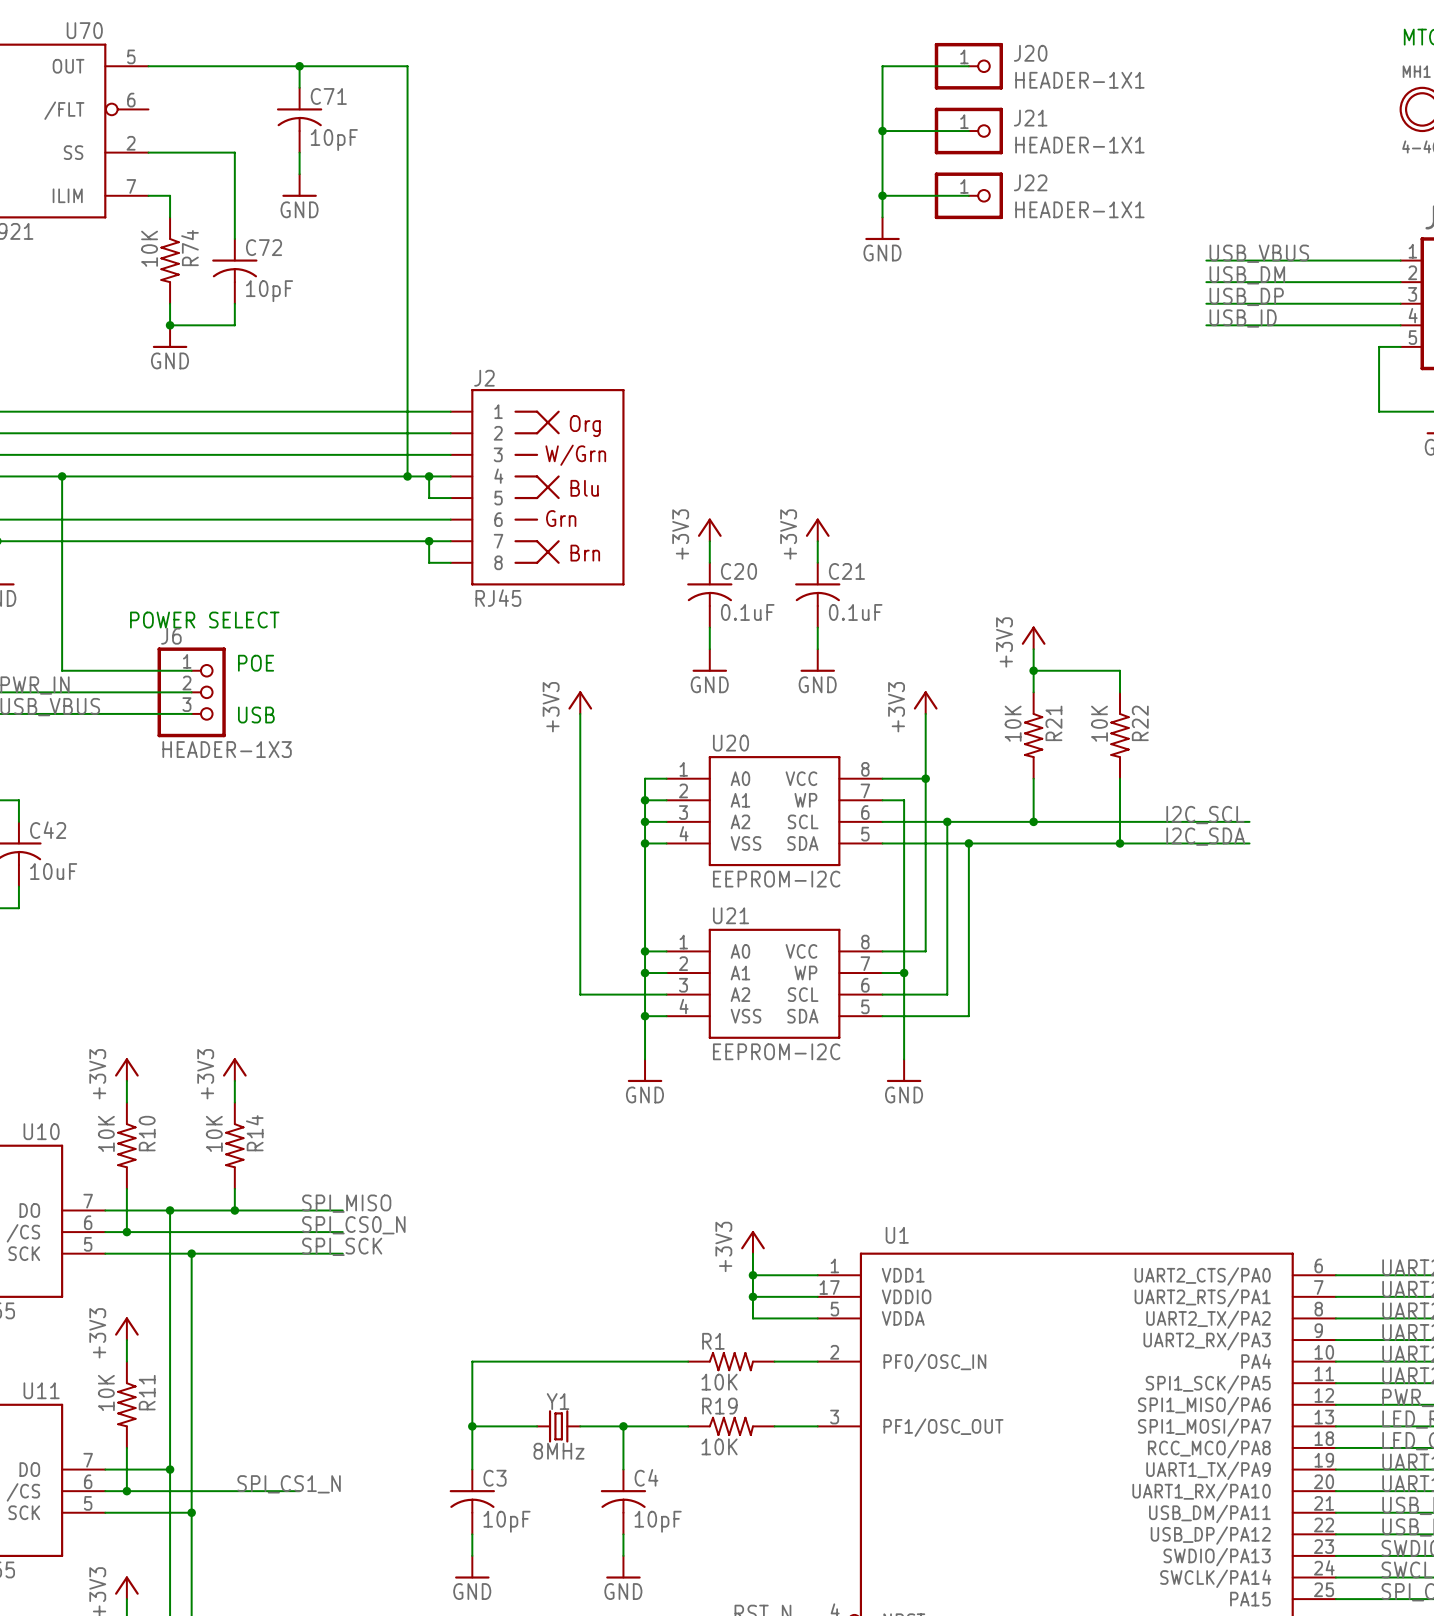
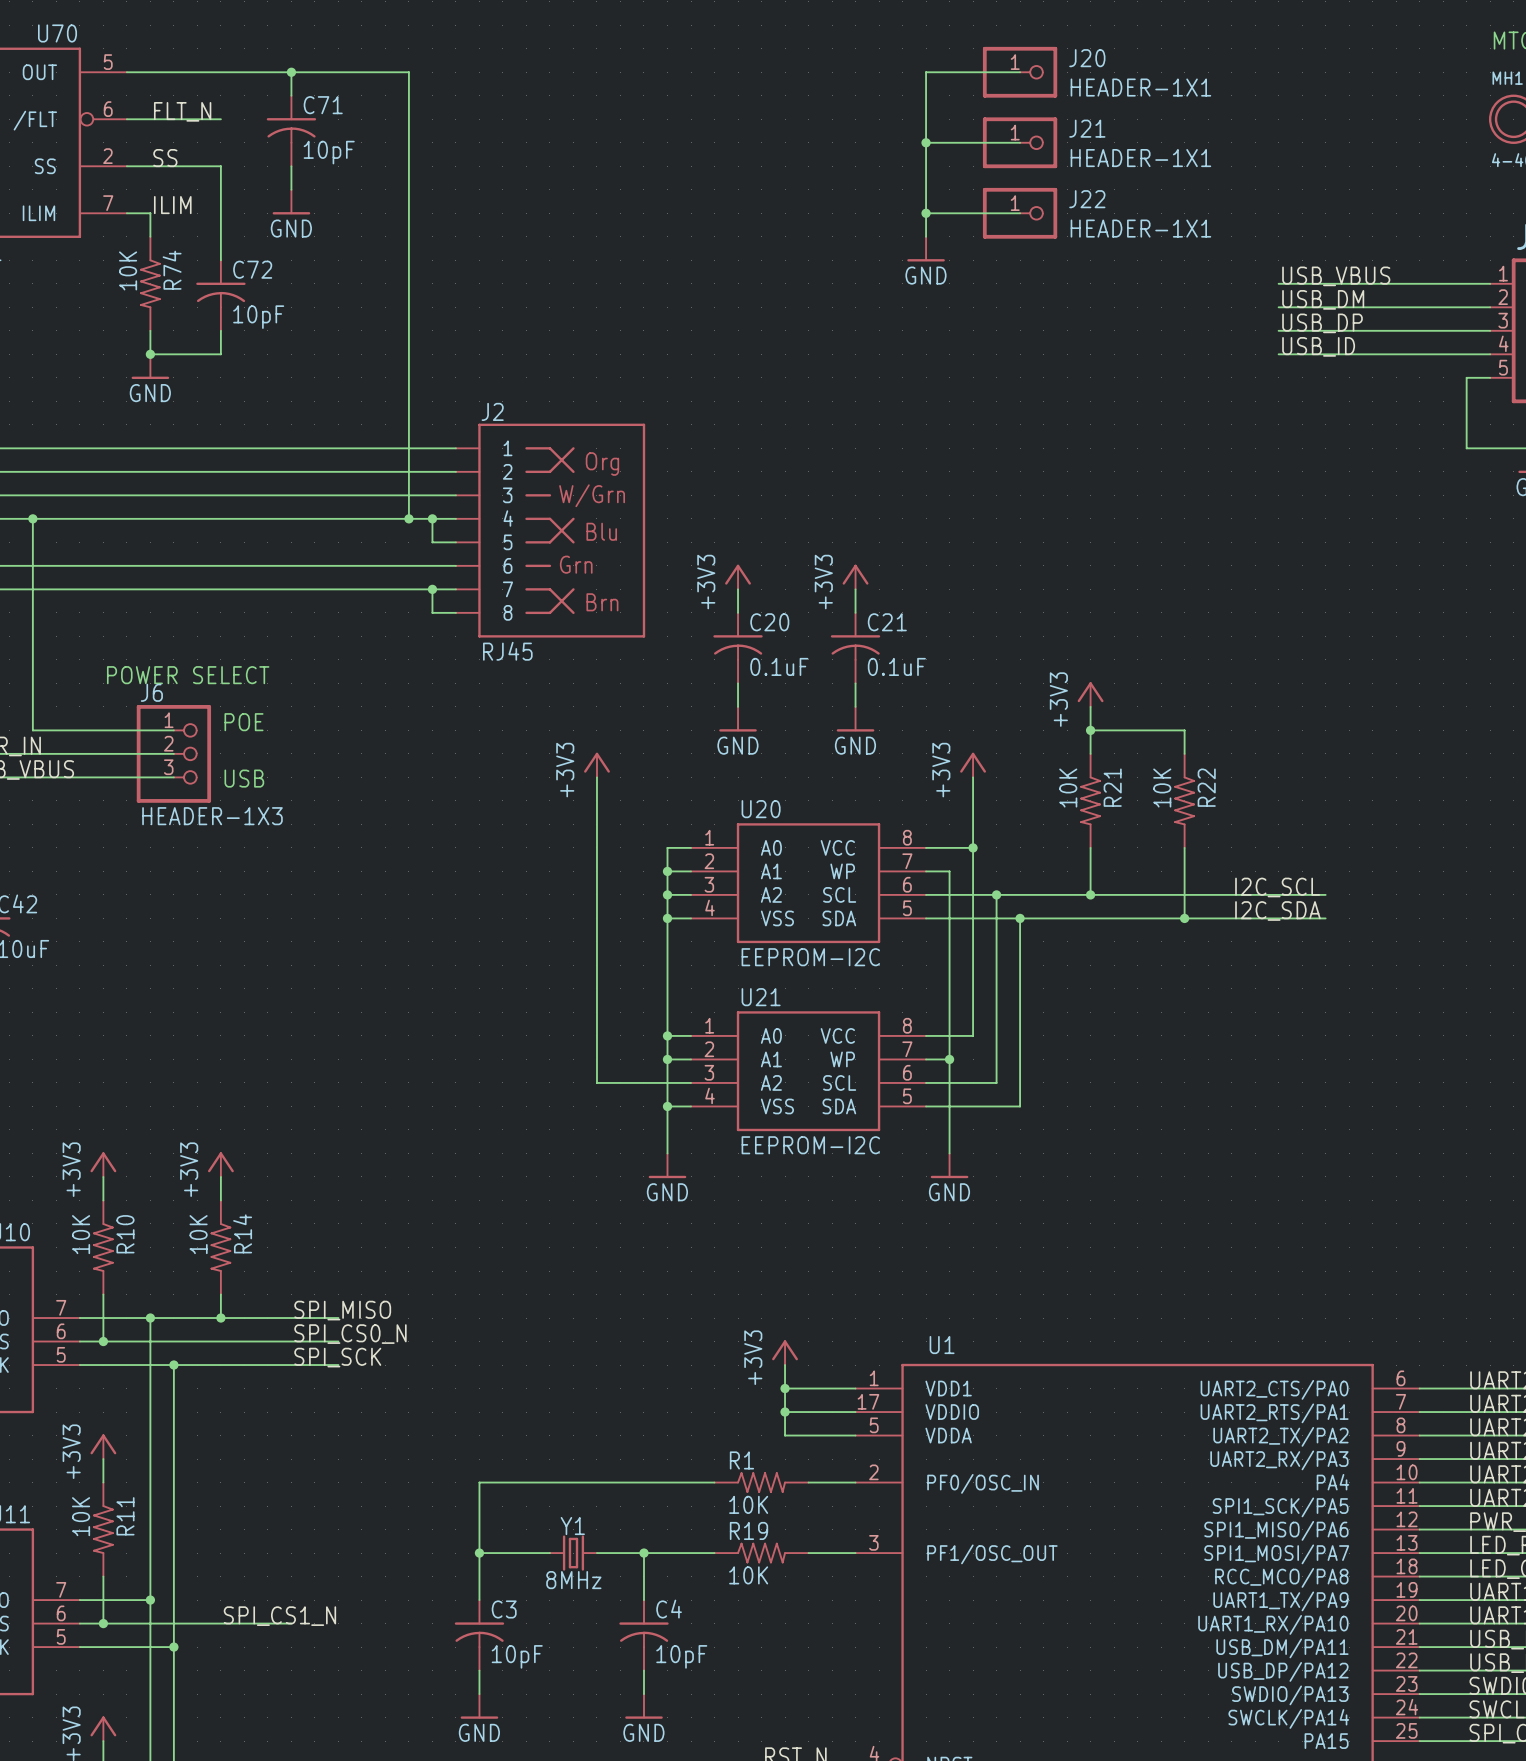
label: none -> FLT_N (182, 111)
wire: none -> (126, 119) (220, 119)
label: none -> SS (165, 158)
label: none -> ILIM (172, 205)

